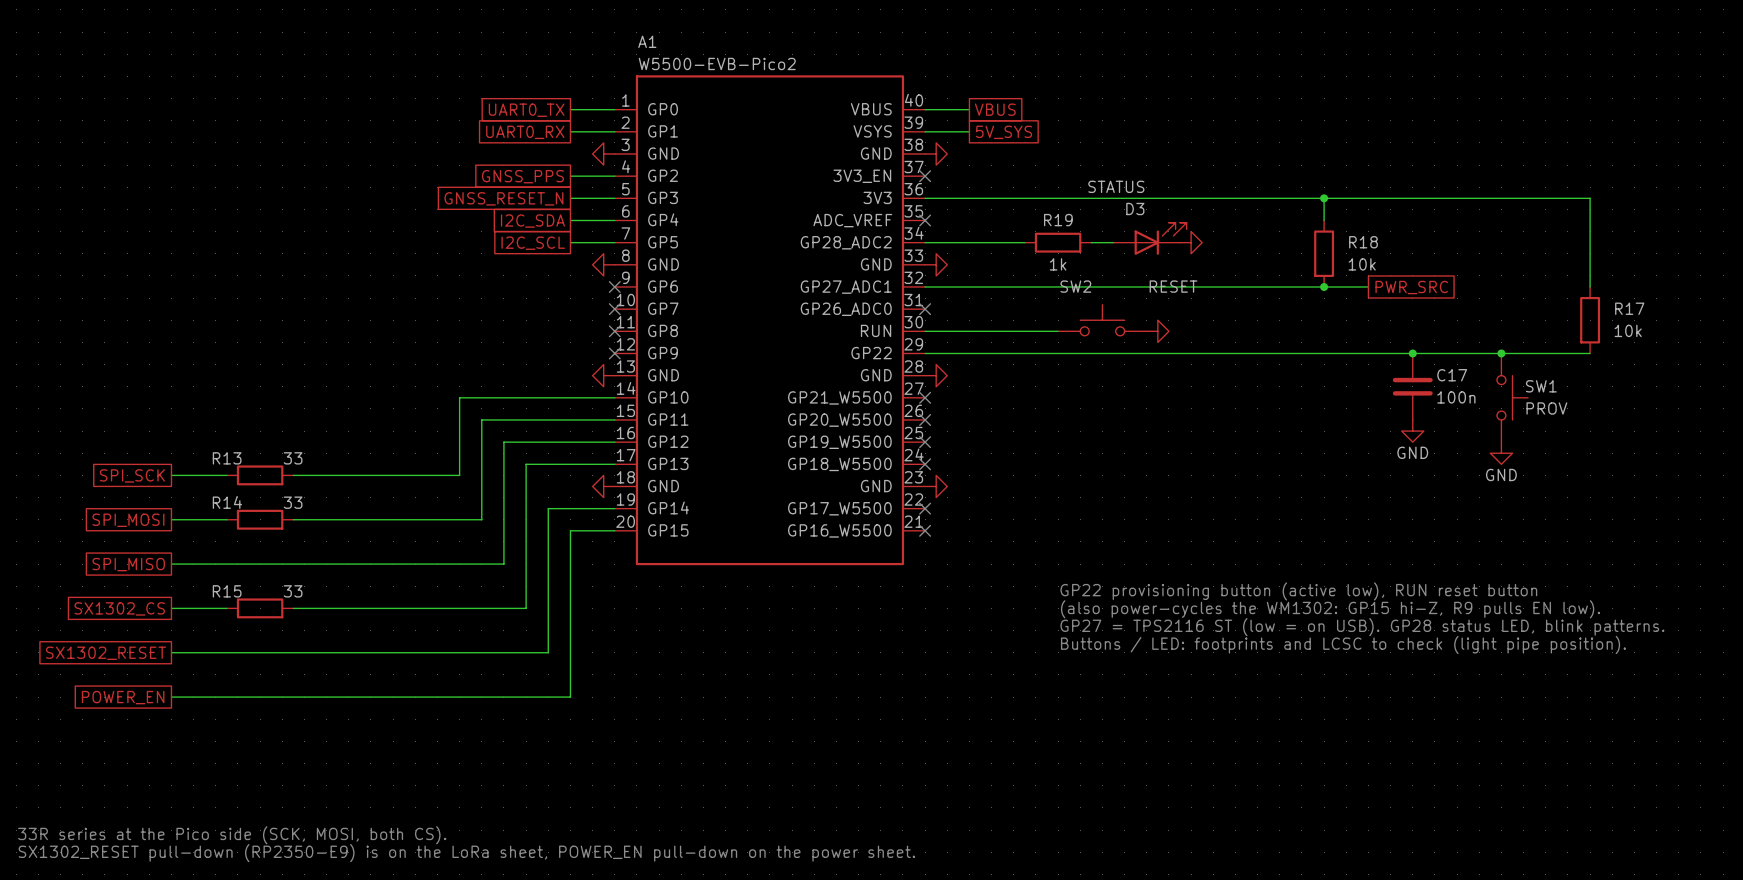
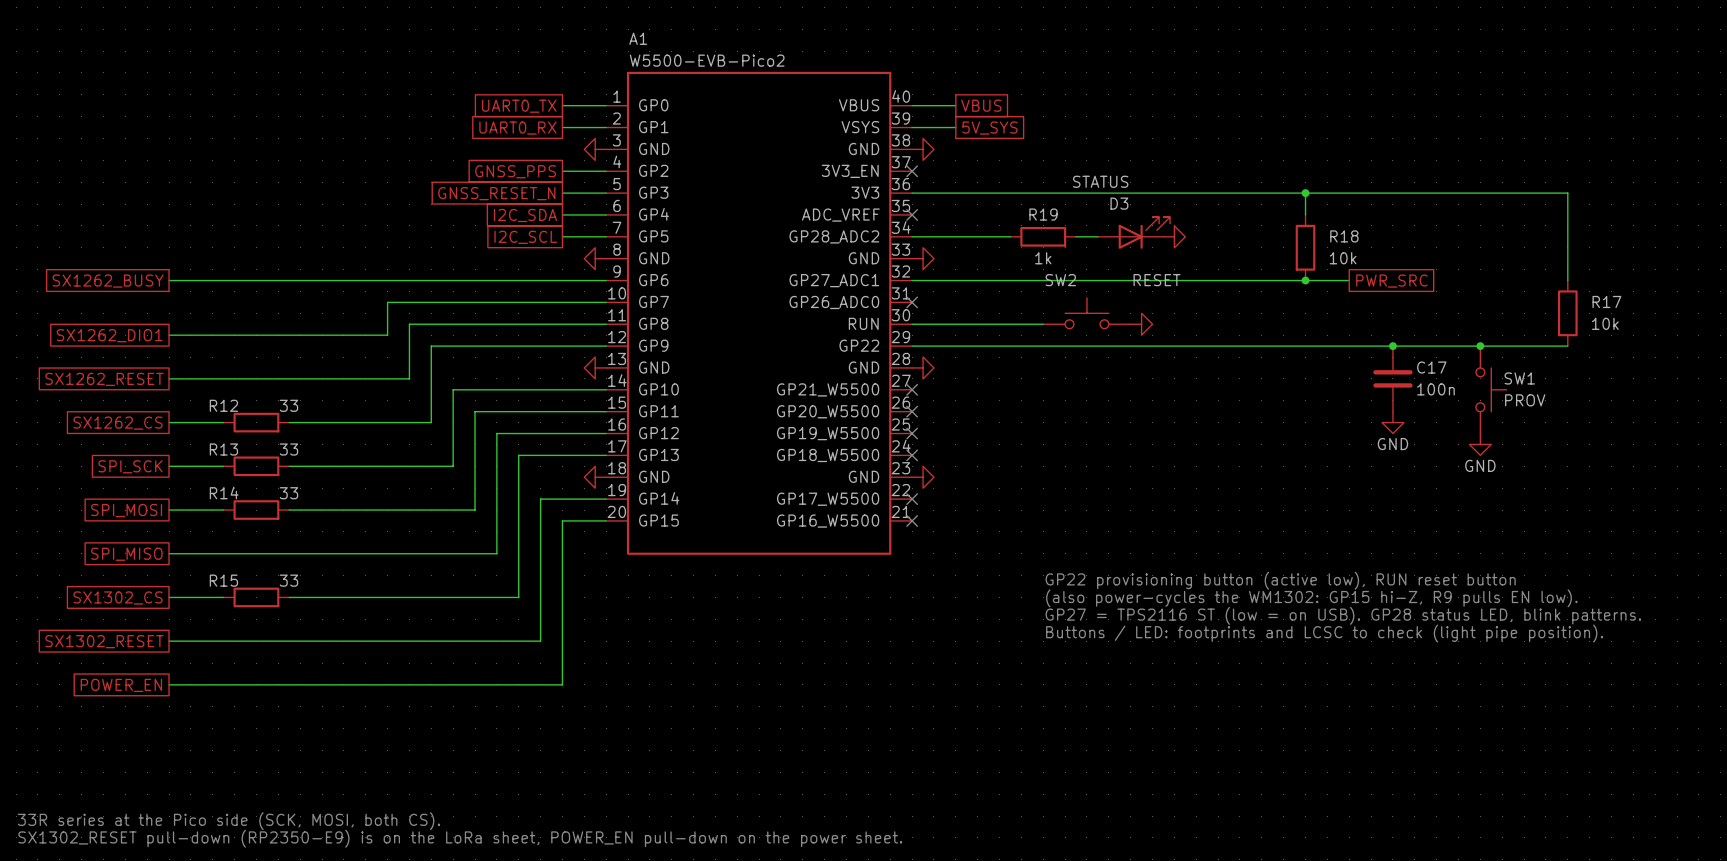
wire: none -> (169, 280) (606, 280)
no-connect mark: (614, 286) -> none
global label: none -> SX1262_BUSY (108, 281)
wire: none -> (606, 302) (387, 302) (387, 335) (169, 335)
no-connect mark: (614, 309) -> none
wire: none -> (606, 324) (409, 324) (409, 378) (169, 378)
no-connect mark: (614, 331) -> none
global label: none -> SX1262_DIO1 (109, 335)
wire: none -> (606, 346) (431, 346) (431, 422) (289, 422)
no-connect mark: (614, 353) -> none
global label: none -> SX1262_RESET (104, 379)
global label: none -> SX1262_CS (118, 423)
wire: none -> (169, 422) (223, 422)
R12: none -> 33 (256, 422)

